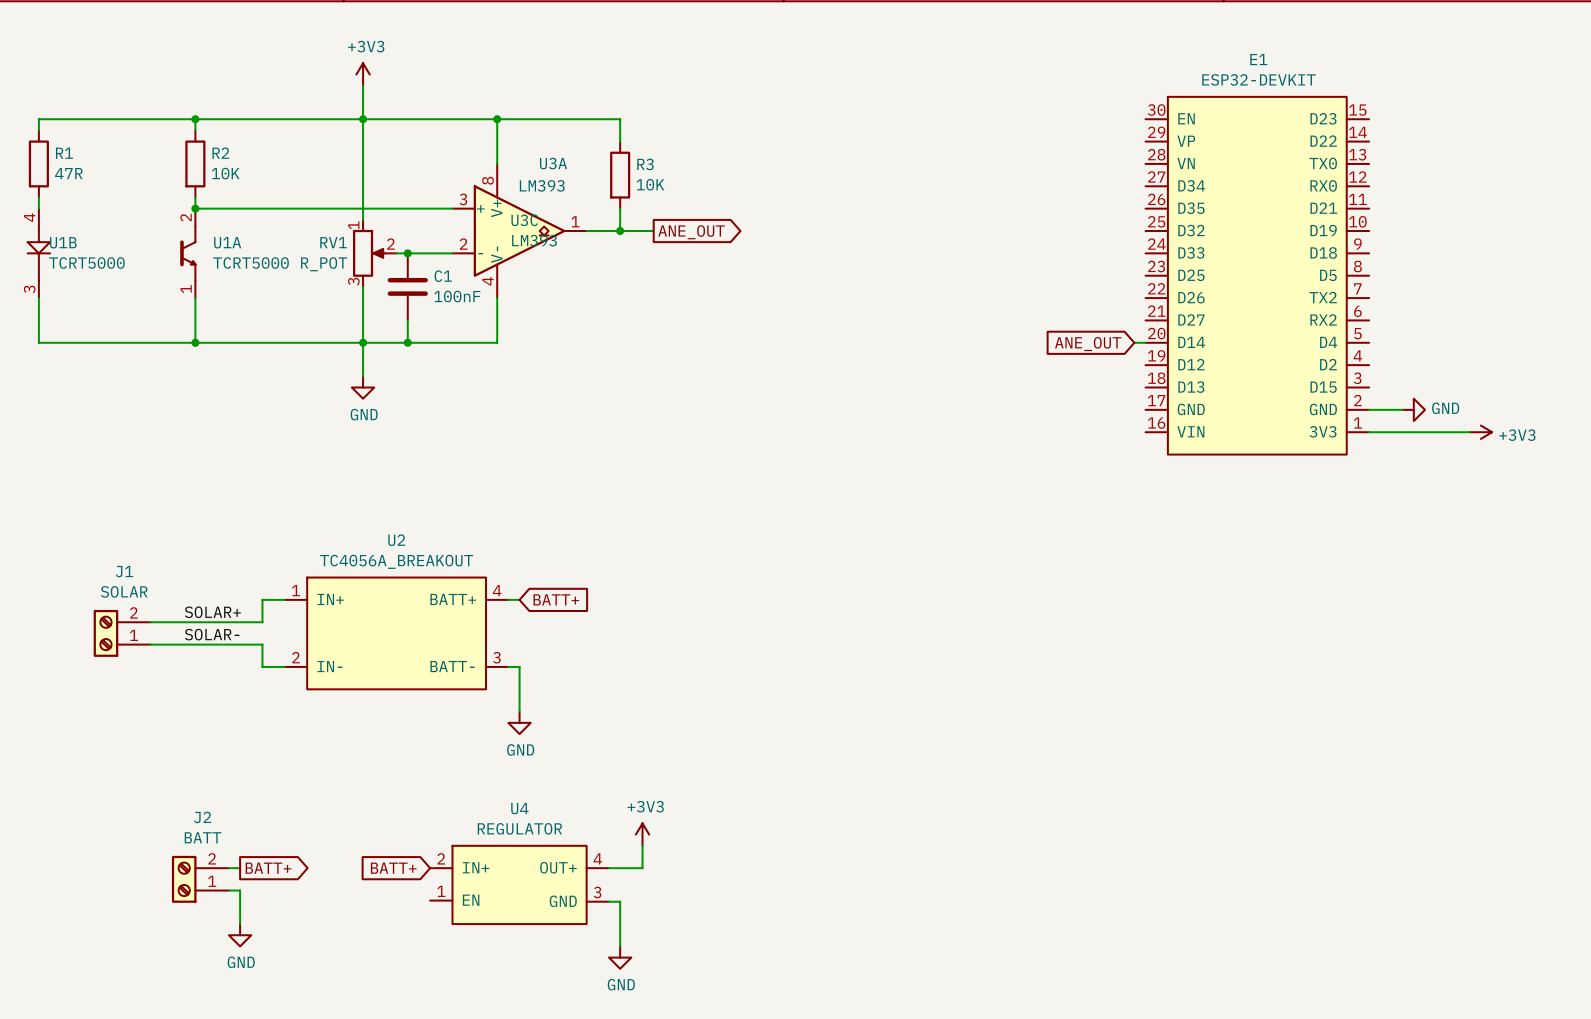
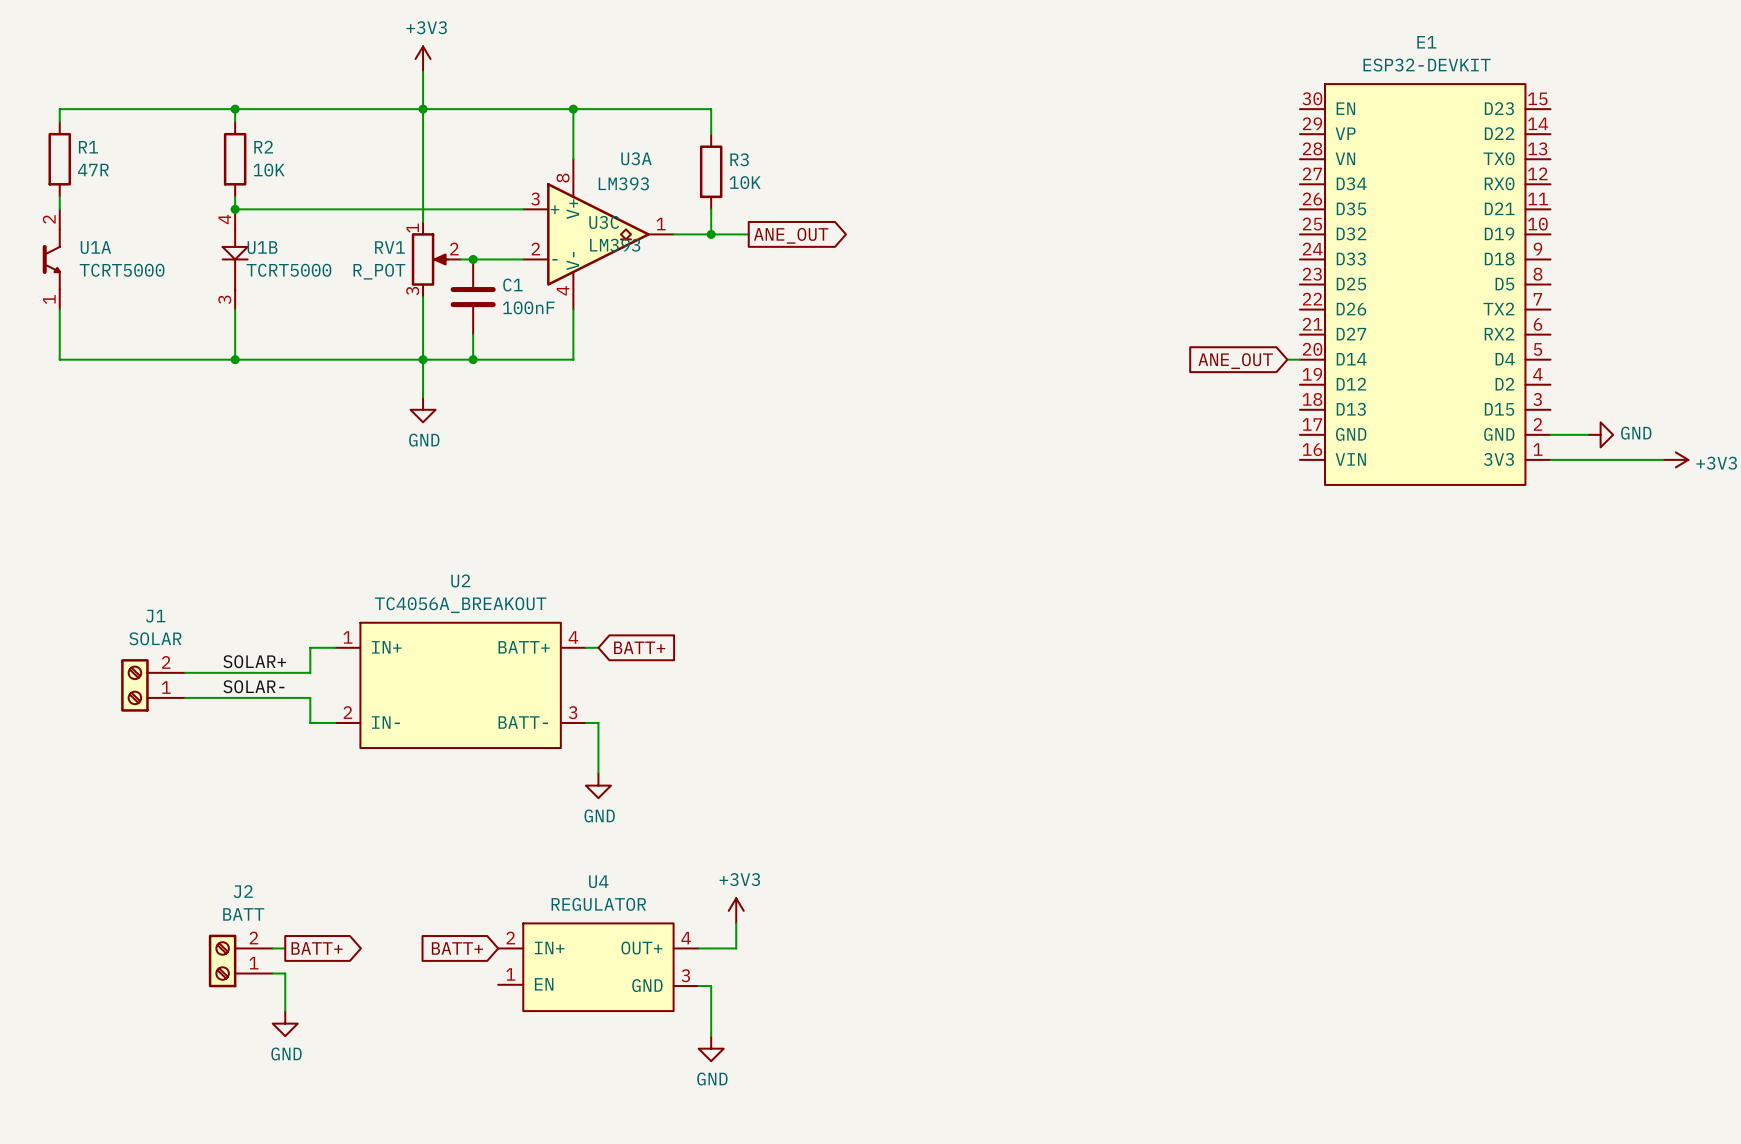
U1B position: (38, 253) -> (235, 259)
U1A position: (188, 253) -> (51, 259)

